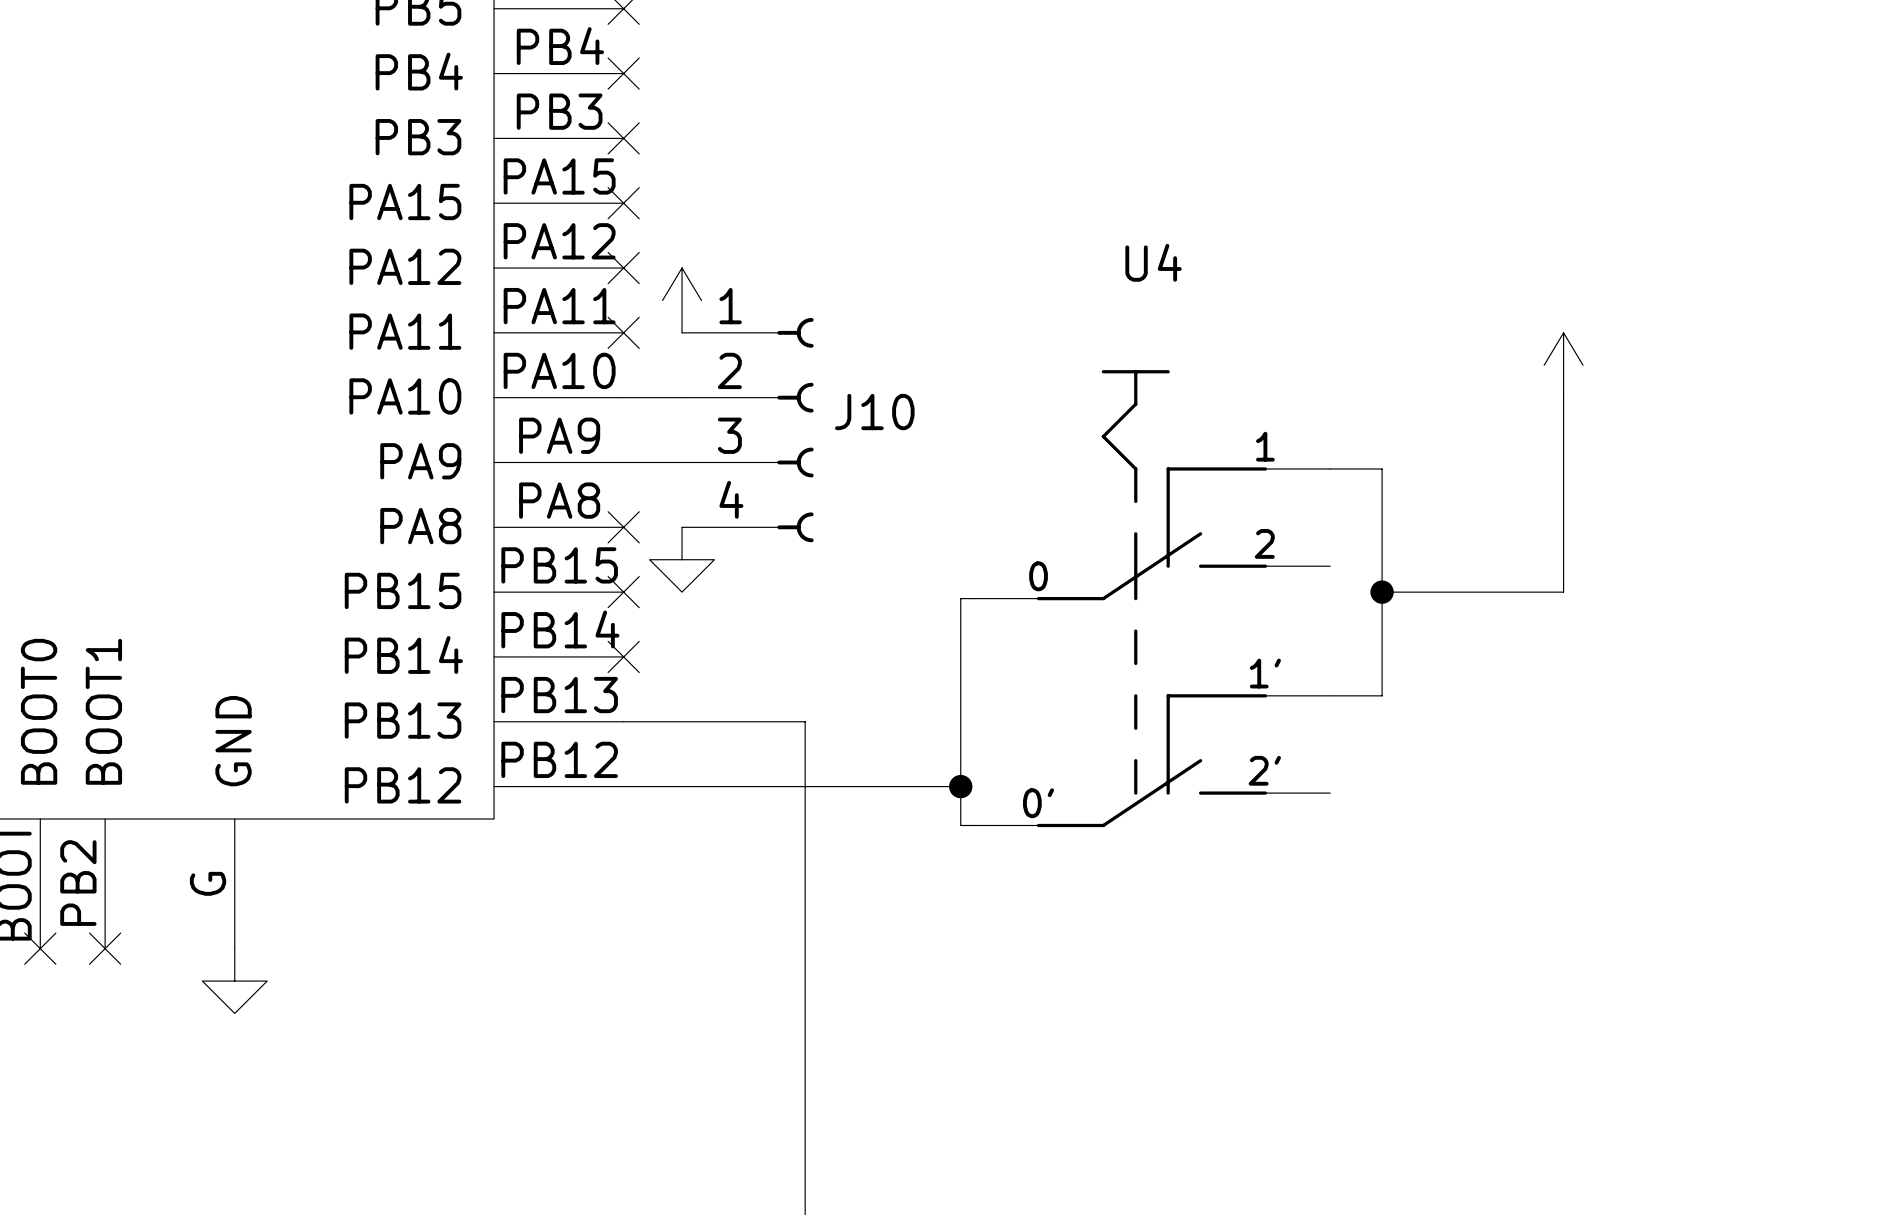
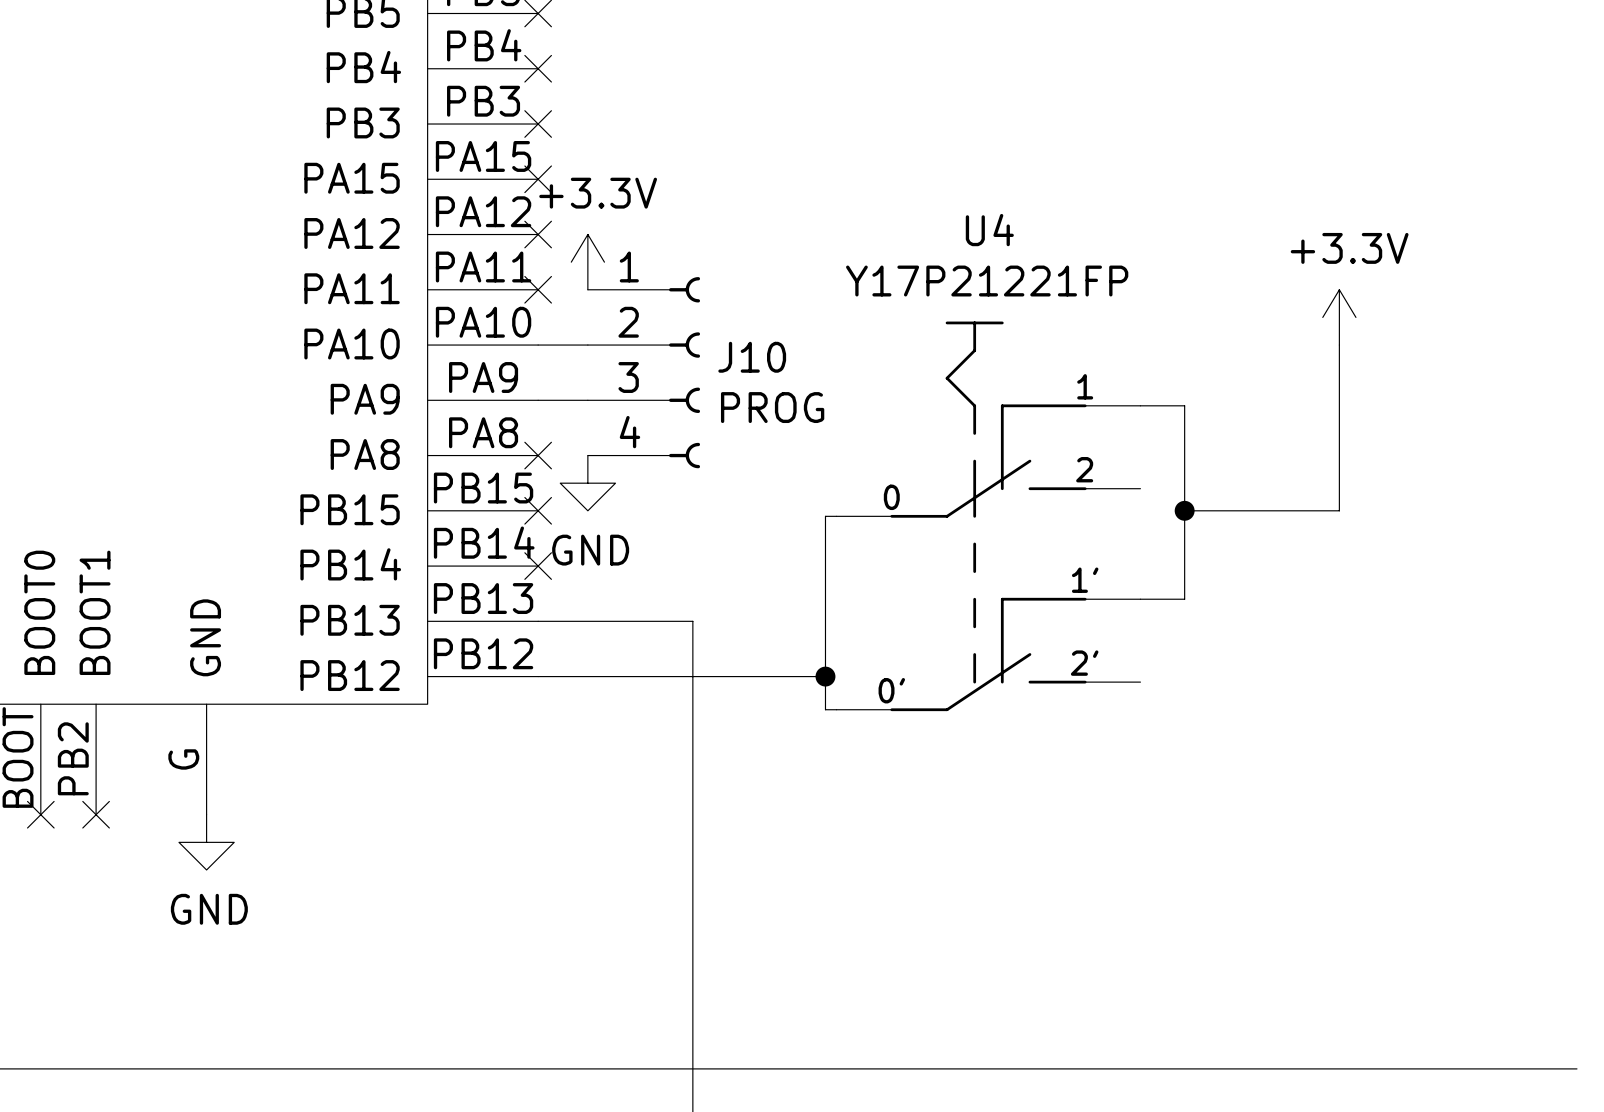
power symbol text: none -> +3.3V (598, 193)
power symbol text: none -> +3.3V (1349, 248)
U4 value: none -> Y17P21221FP (987, 281)
J10 value: none -> PROG (772, 407)
power symbol text: none -> GND (590, 550)
power symbol text: none -> GND (209, 909)

